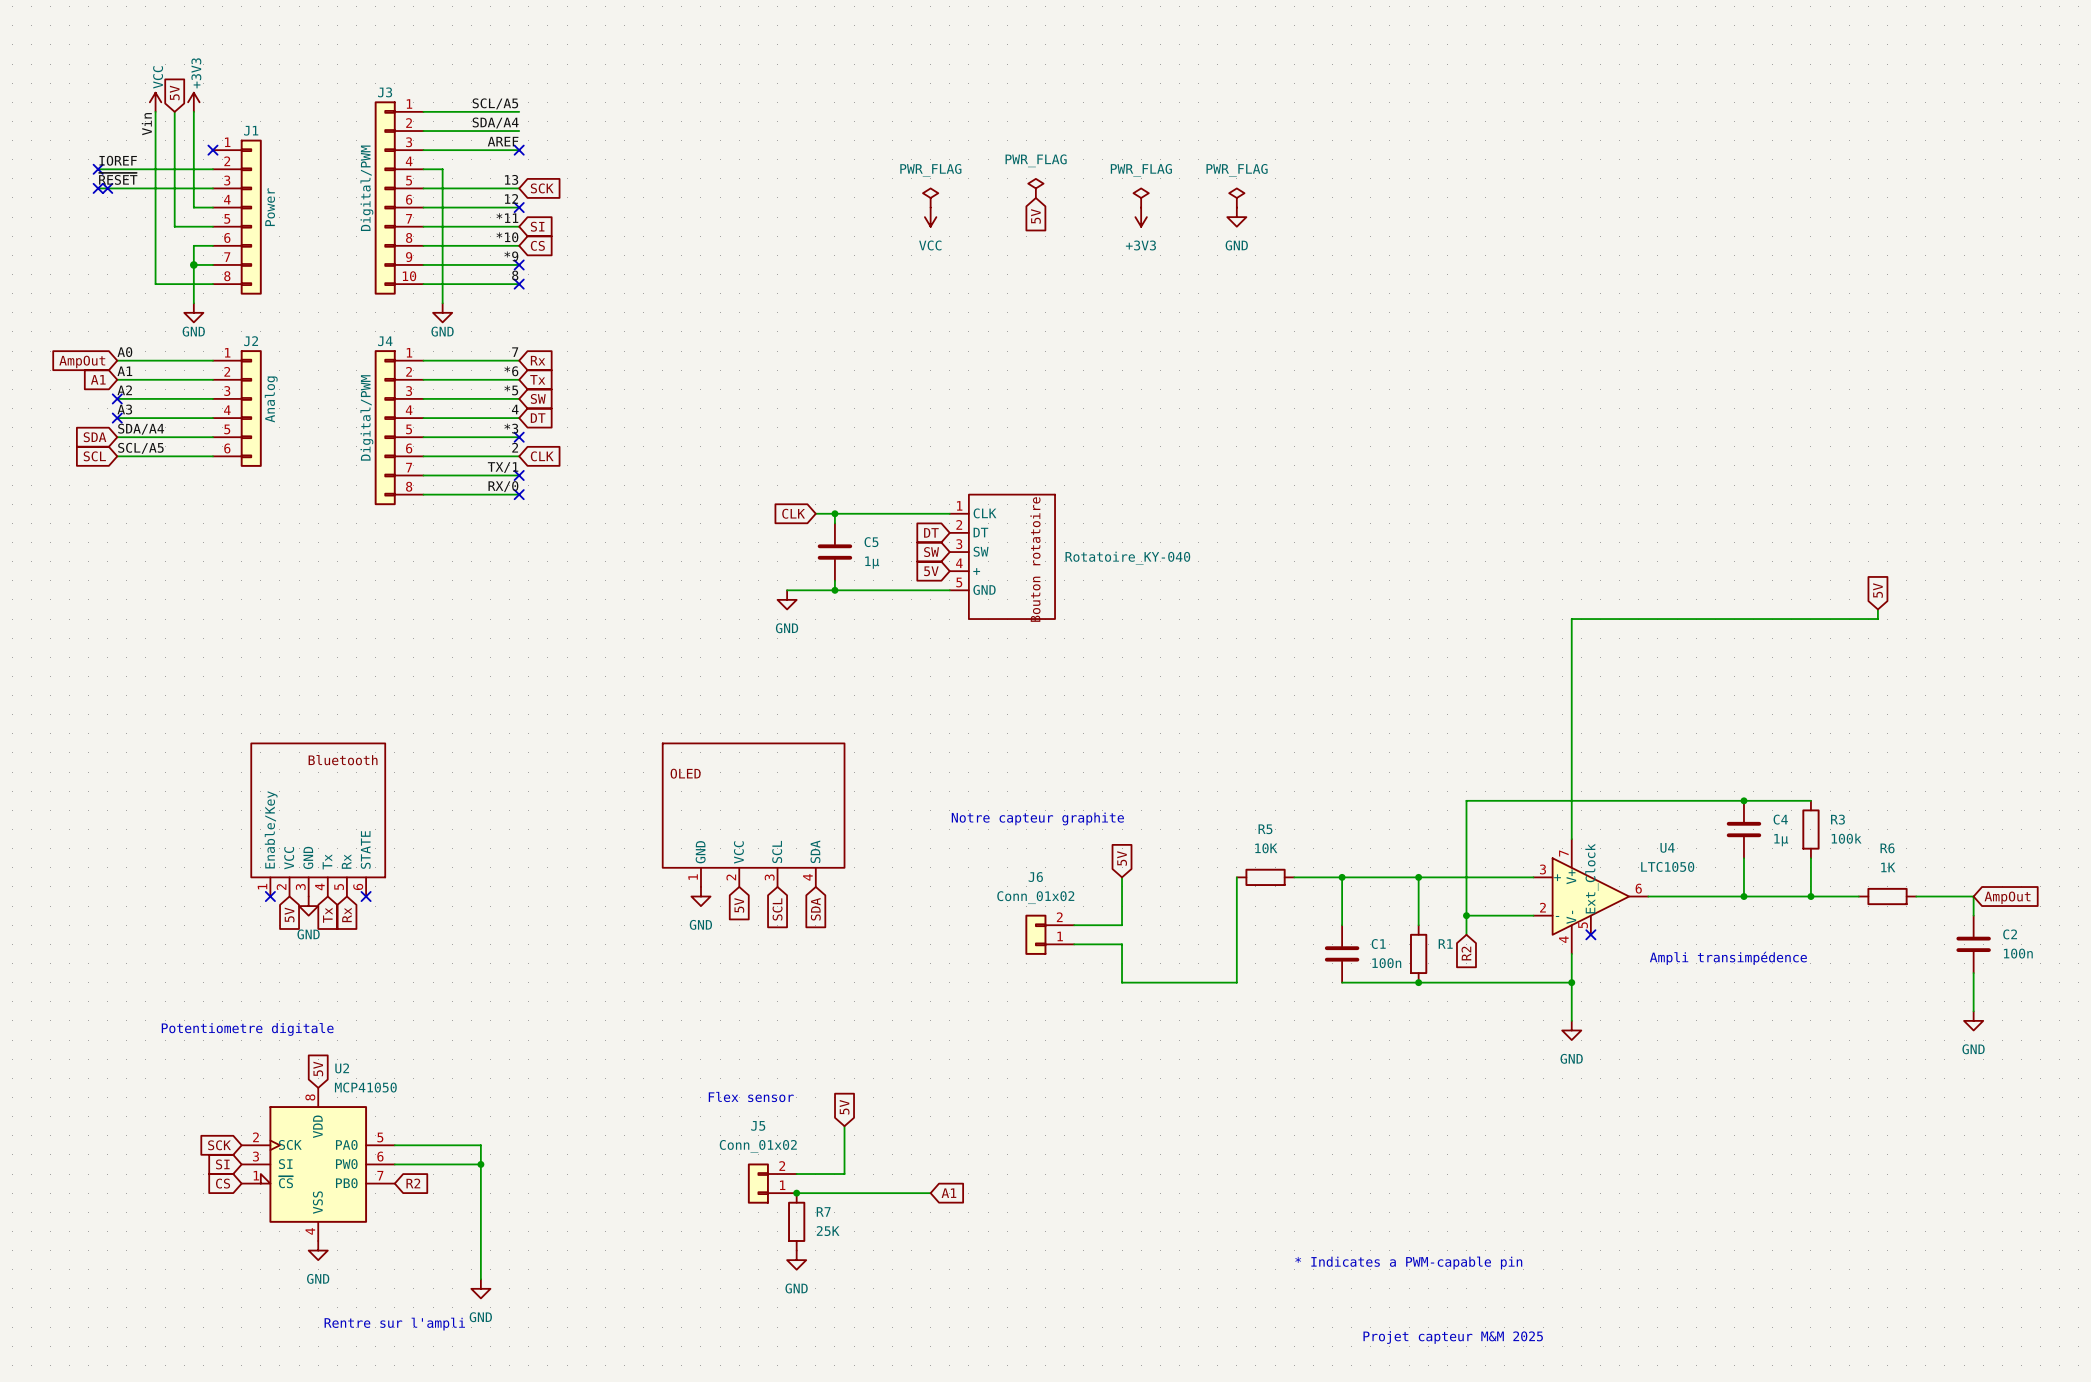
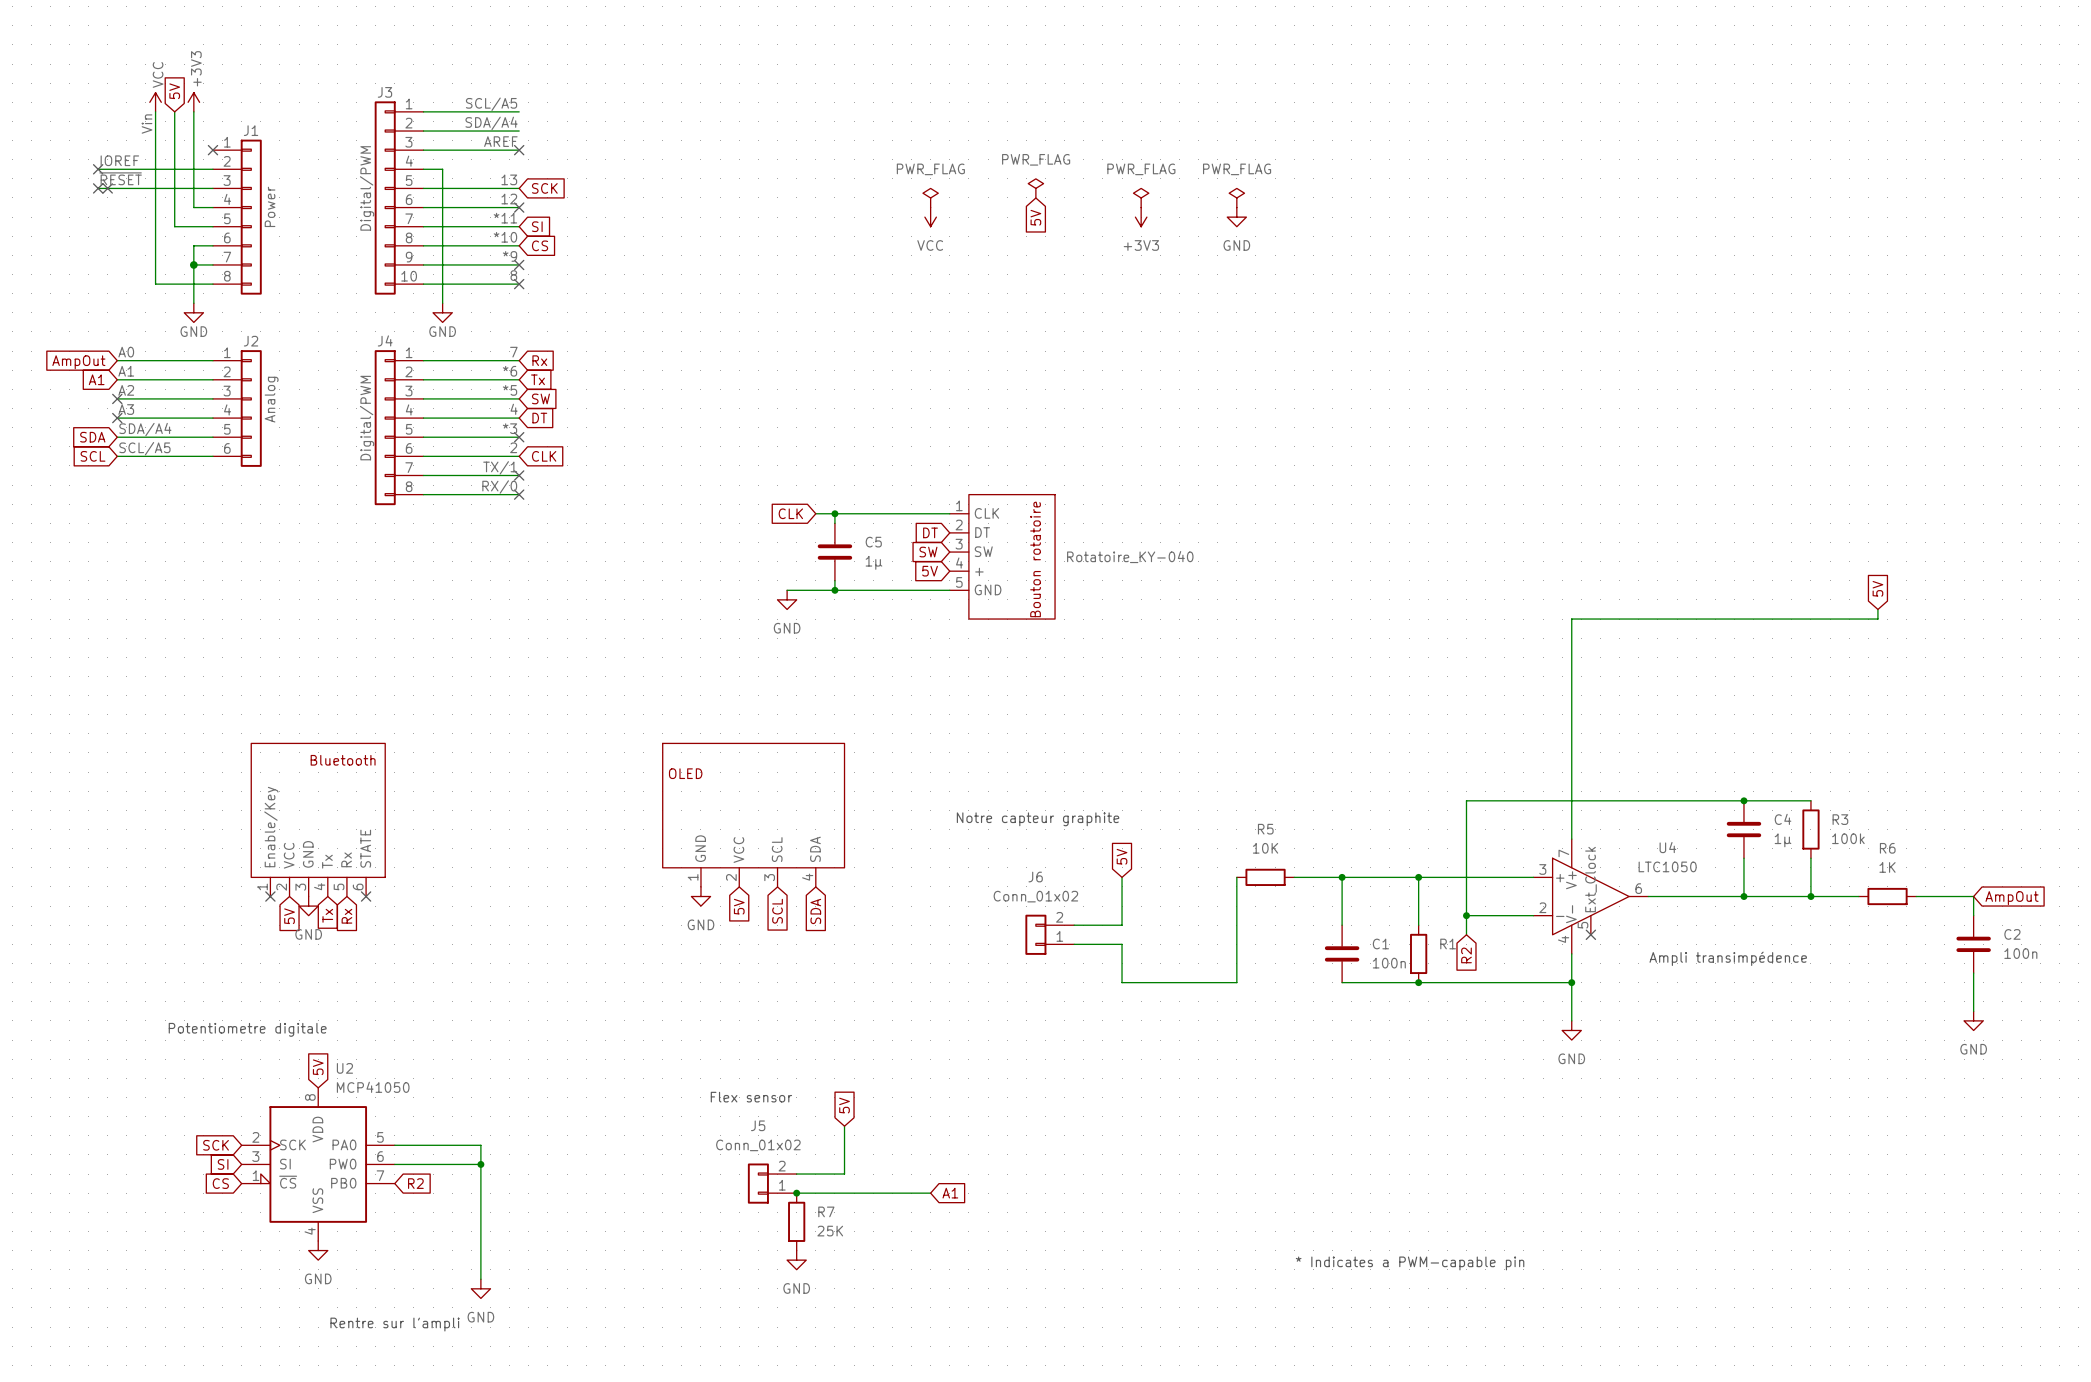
text: Projet capteur M&M 2025 (1453, 1337) -> none

